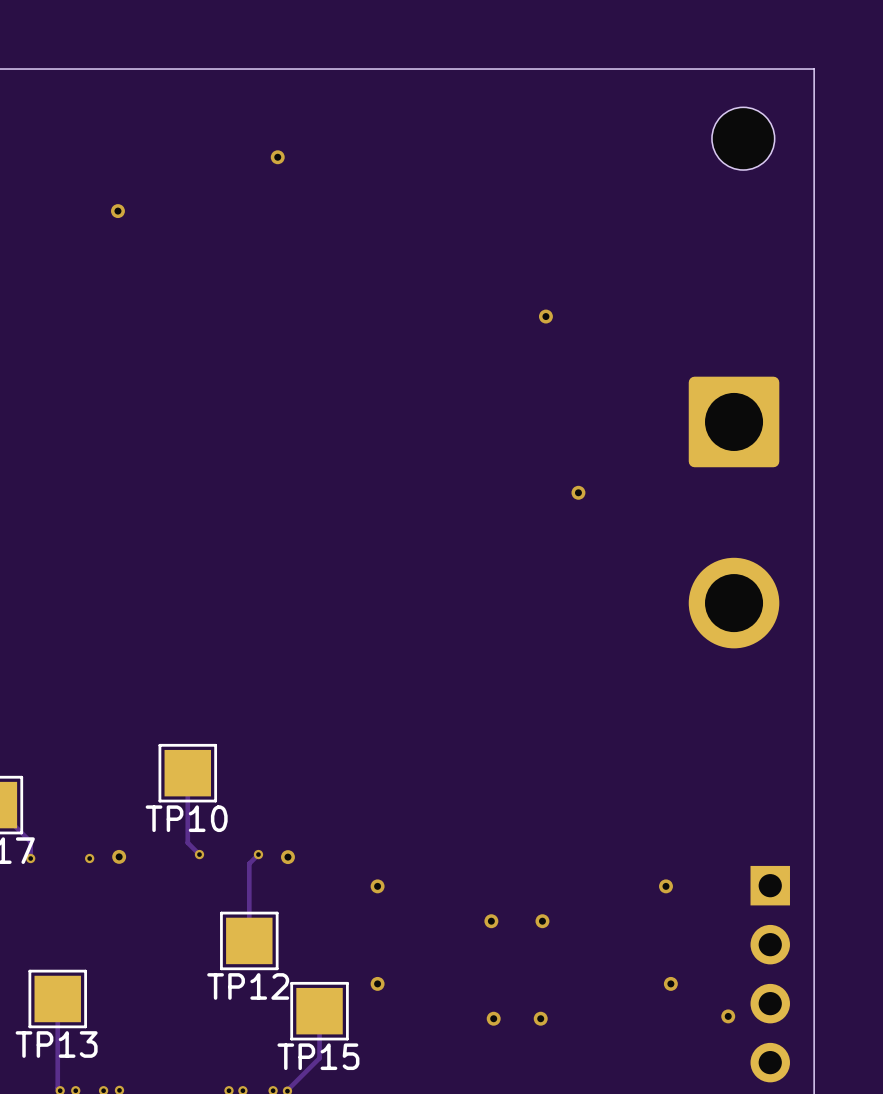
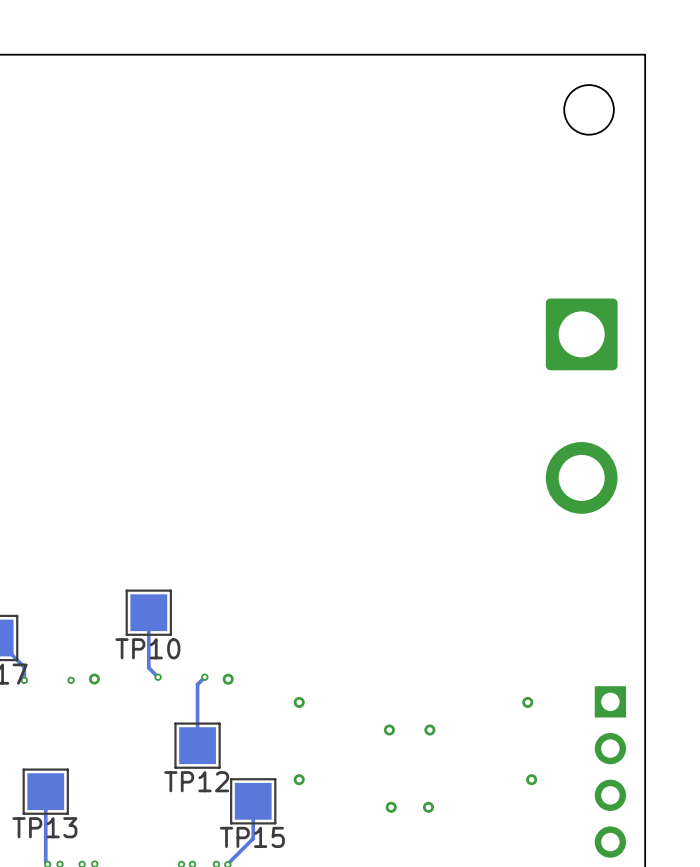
via: (277, 157) -> none
via: (117, 211) -> none
via: (545, 316) -> none
via: (578, 492) -> none
via: (728, 1016) -> none

